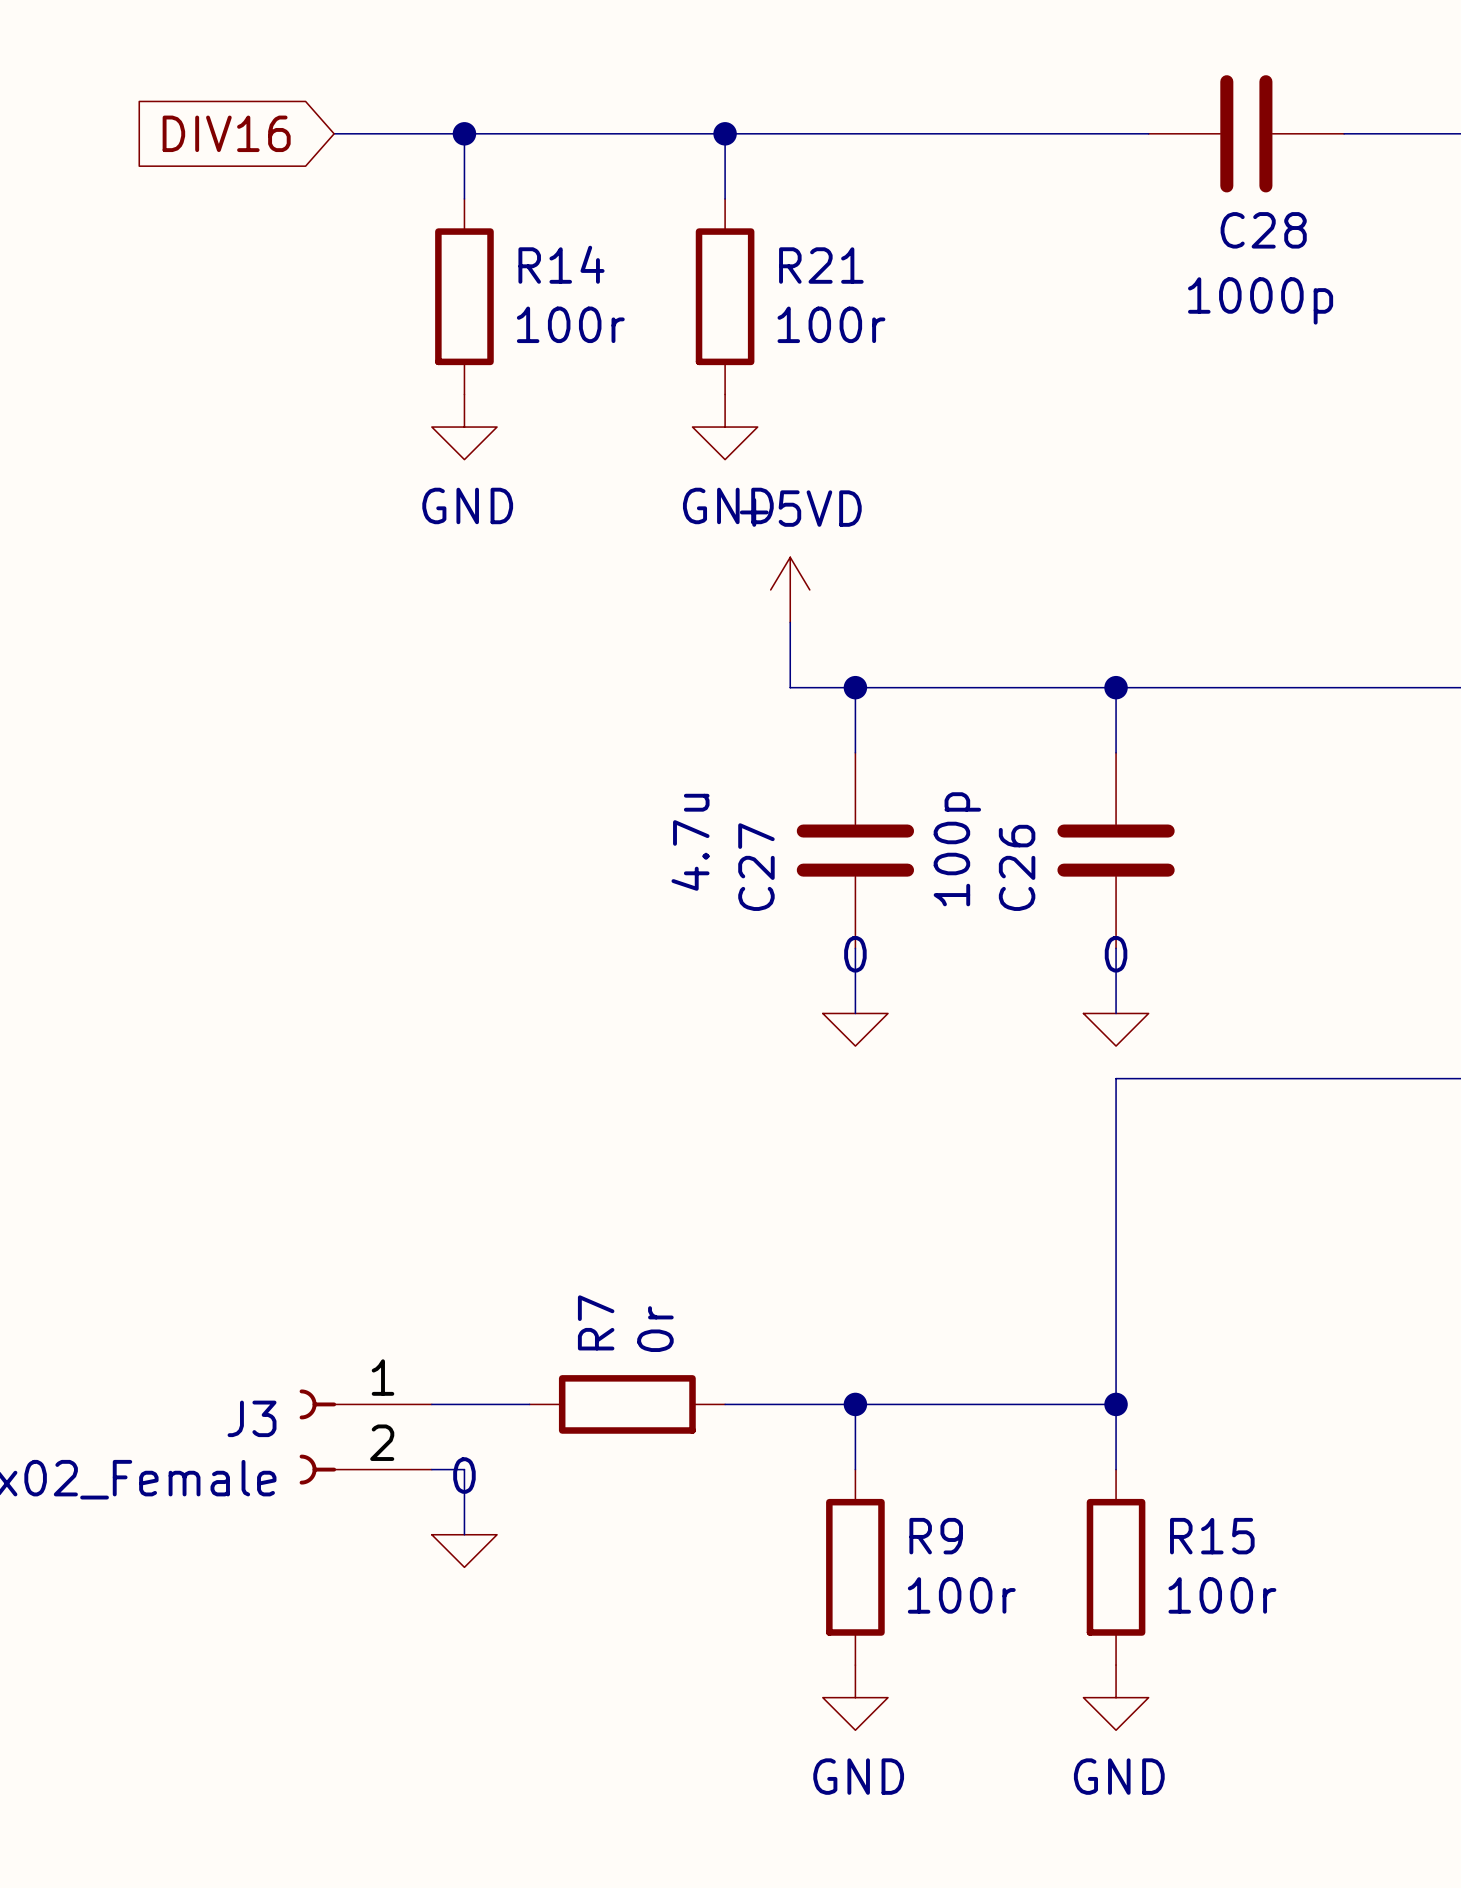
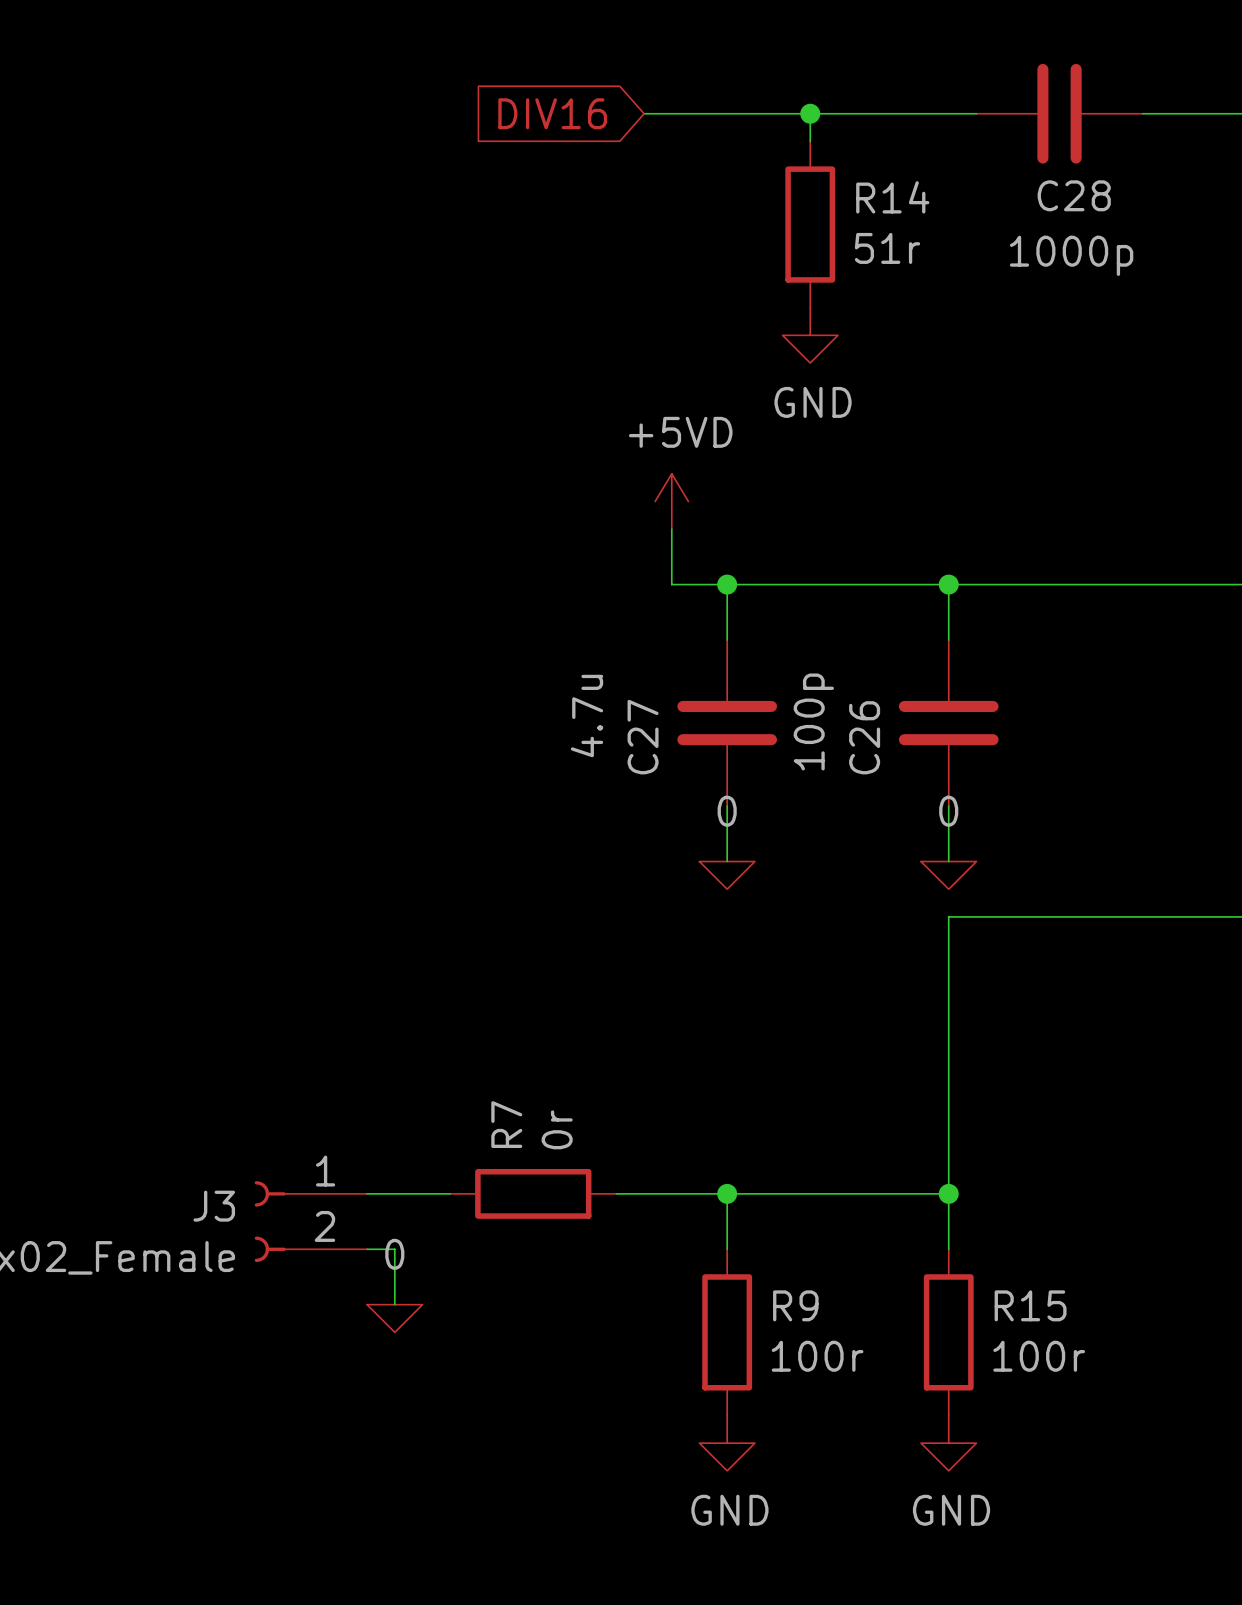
global label position: DIV16 (226, 133) -> DIV16 (552, 113)
wire: (334, 133) (757, 133) -> none
wire: (464, 133) (464, 198) -> none
junction: (464, 133) -> none
wire: (725, 133) (725, 198) -> none
junction: (725, 133) -> none
wire: none -> (810, 113) (810, 141)
junction: none -> (810, 113)
R14 position: (464, 296) -> (810, 224)
R21: 100r (725, 296) -> none
R14 value: 100r (570, 324) -> 51r (887, 248)
power symbol: GND (464, 427) -> none
power symbol position: GND (725, 427) -> GND (810, 335)

